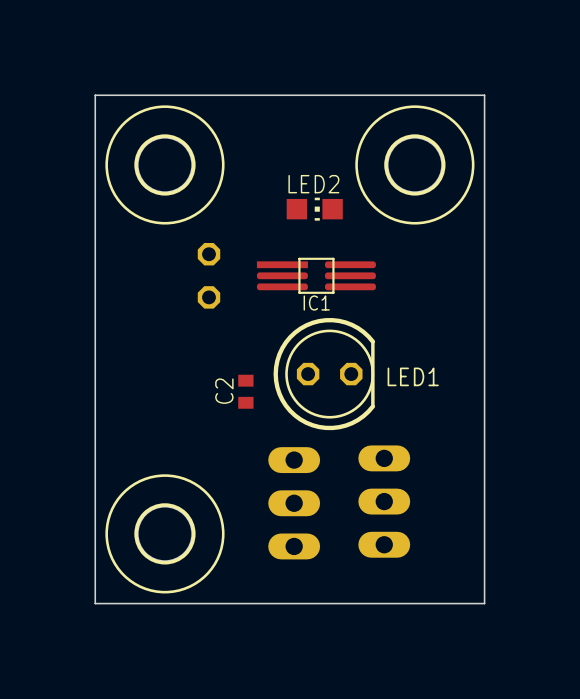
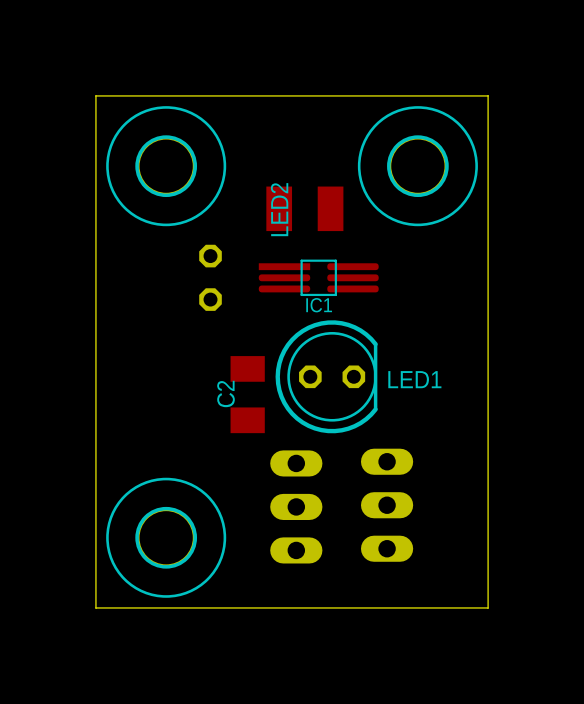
LED2 name position: LED2 (313, 184) -> LED2 (279, 209)
LED2 footprint: [286, 197, 343, 221] -> [266, 186, 344, 232]
C2 footprint: [238, 374, 254, 409] -> [230, 356, 265, 434]

